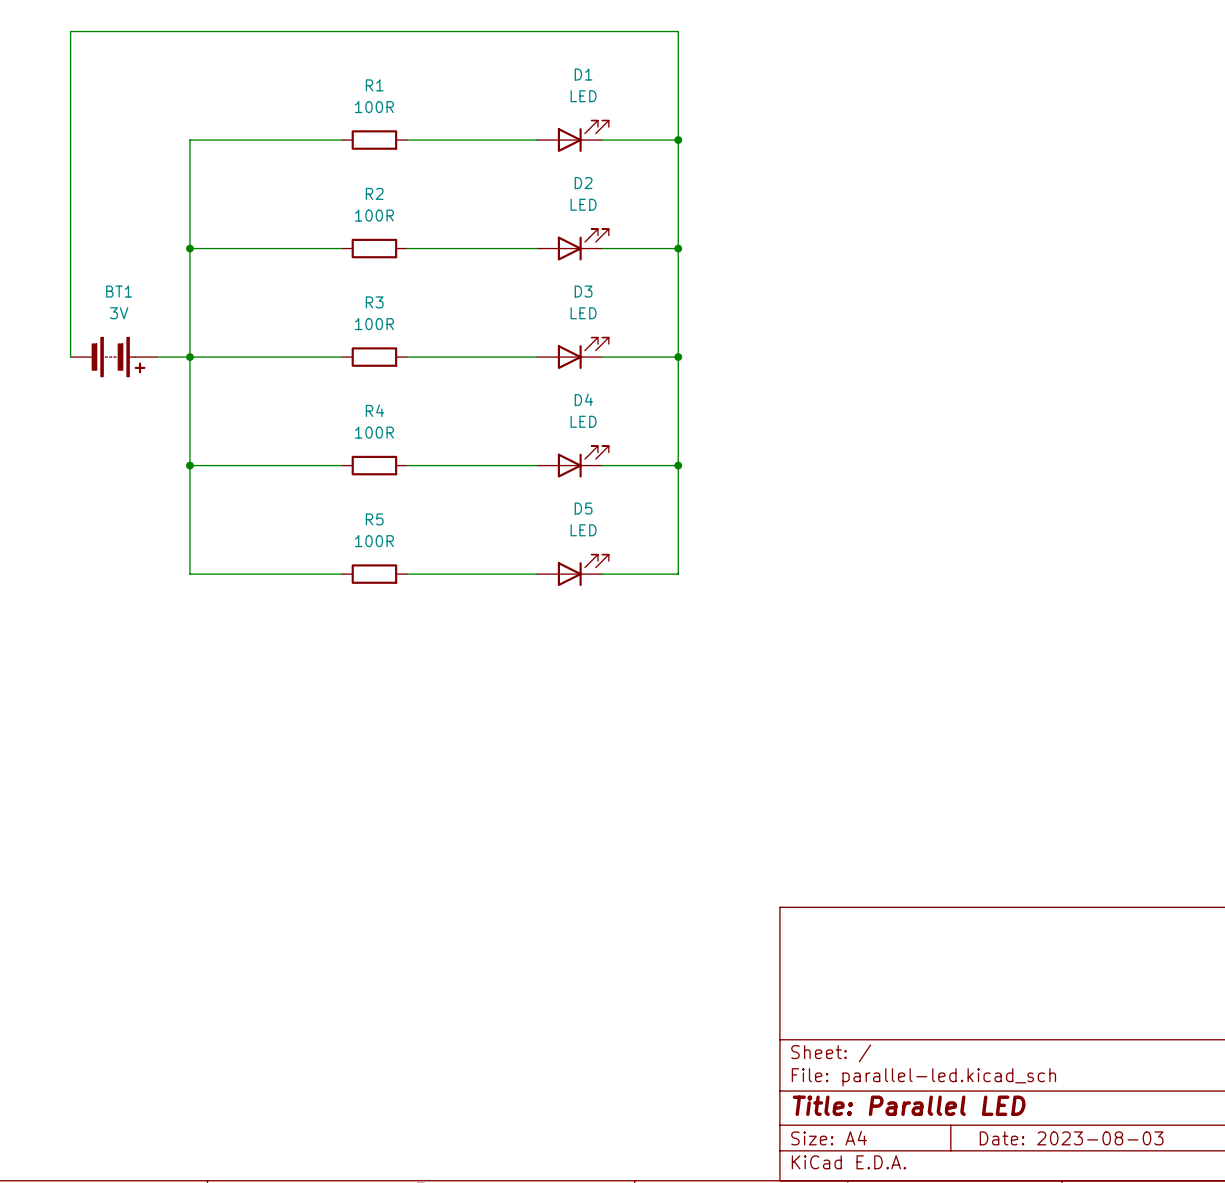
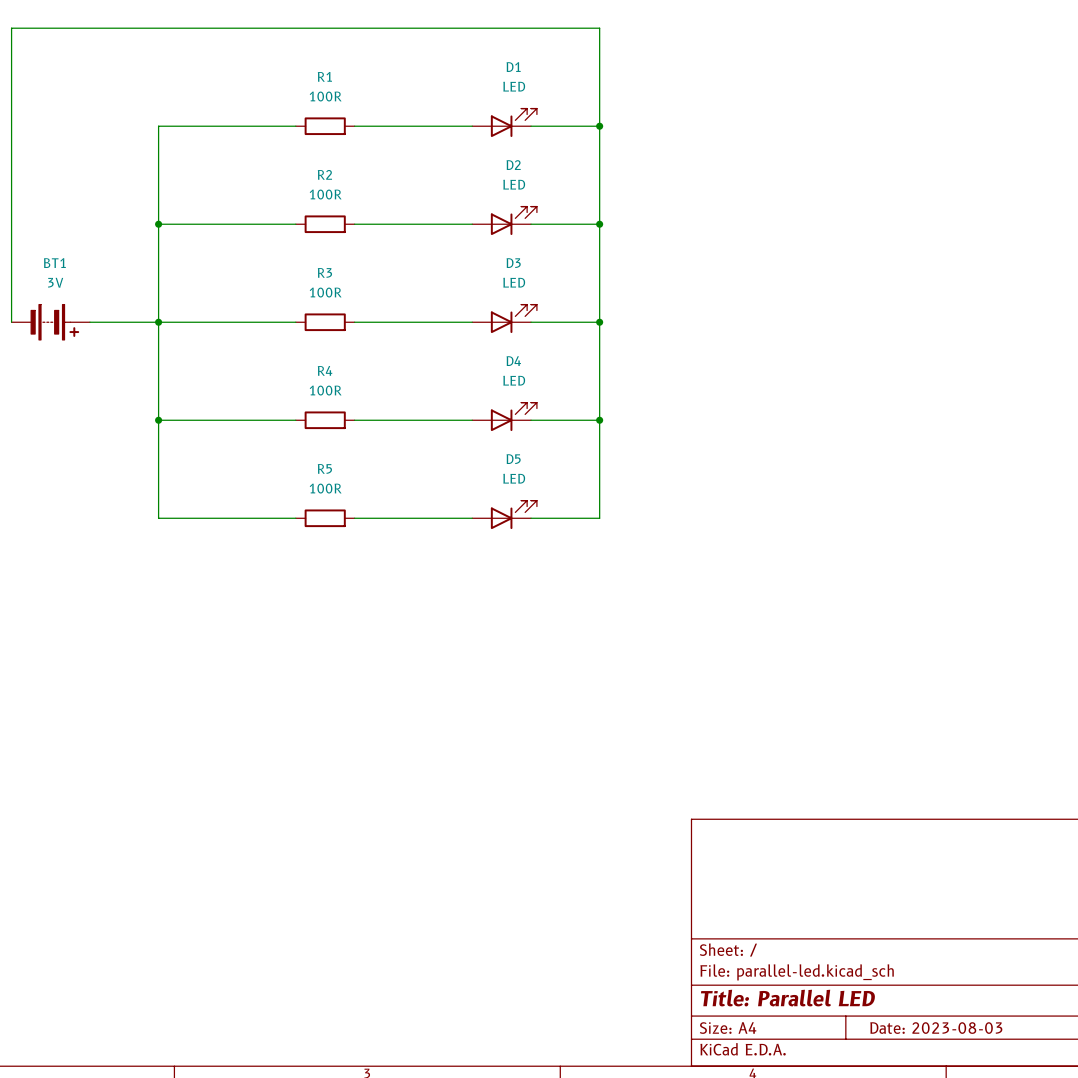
wire: (70, 31) (70, 357) -> (50, 28) (11, 28) (11, 322)
BT1 position: (114, 357) -> (50, 322)

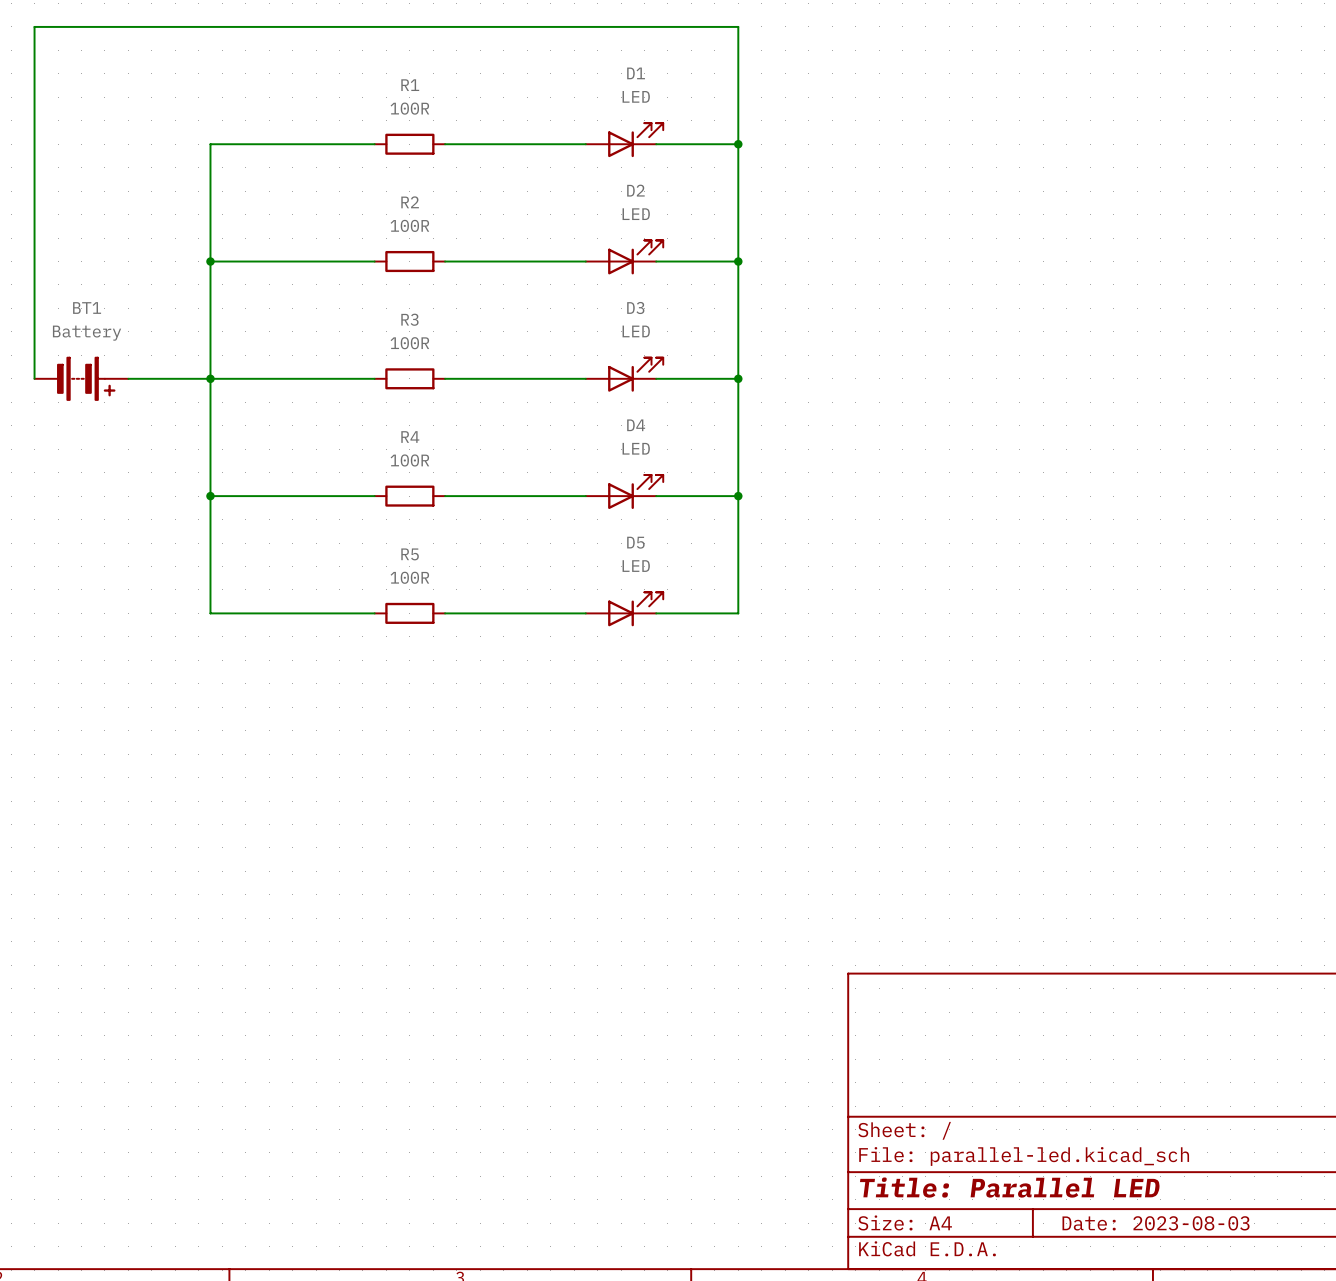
BT1 value: 3V (55, 282) -> Battery (87, 333)

